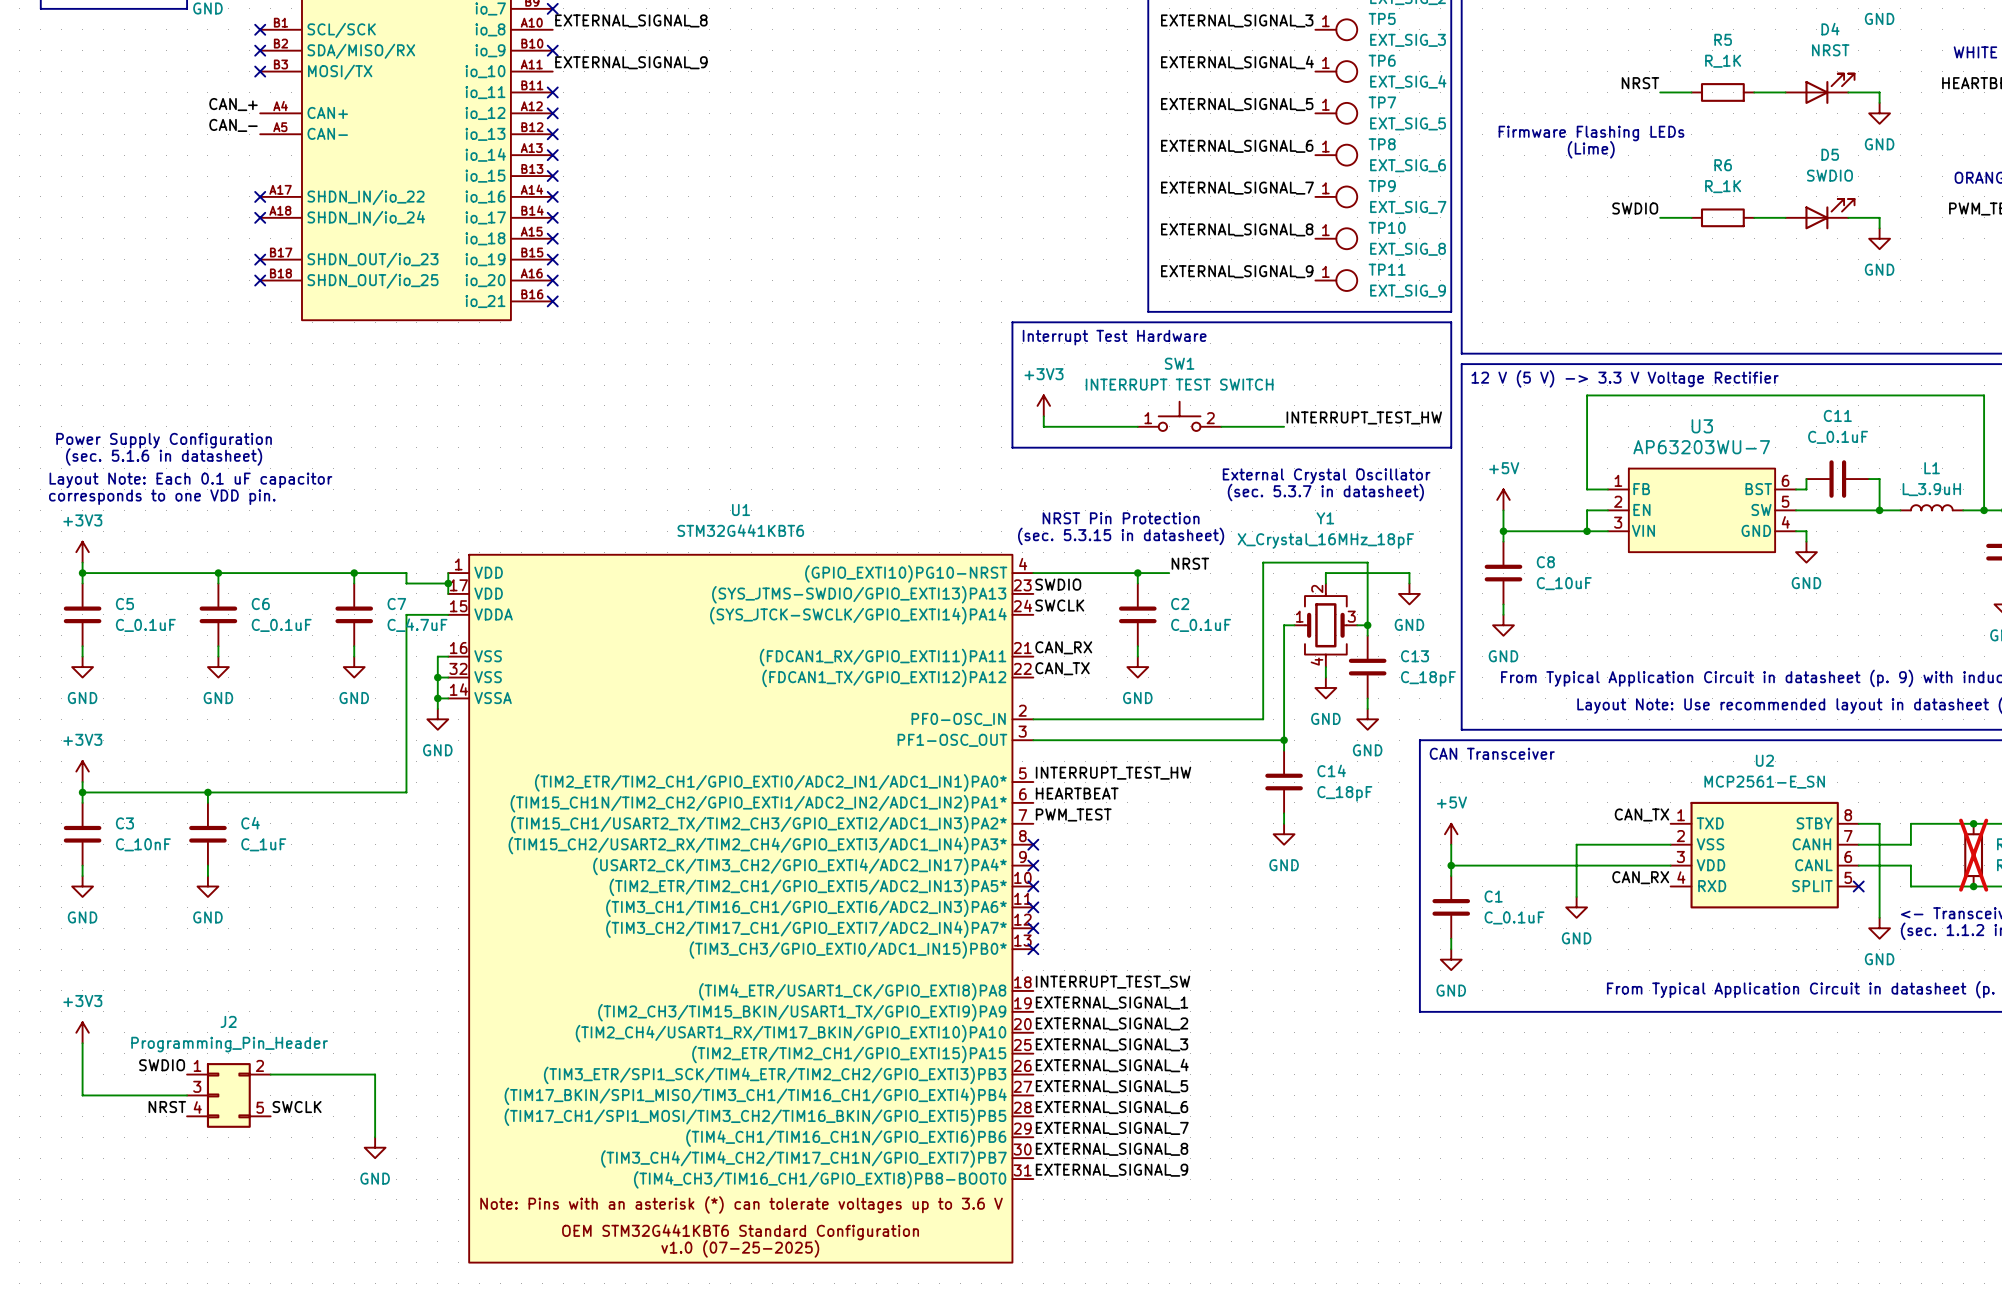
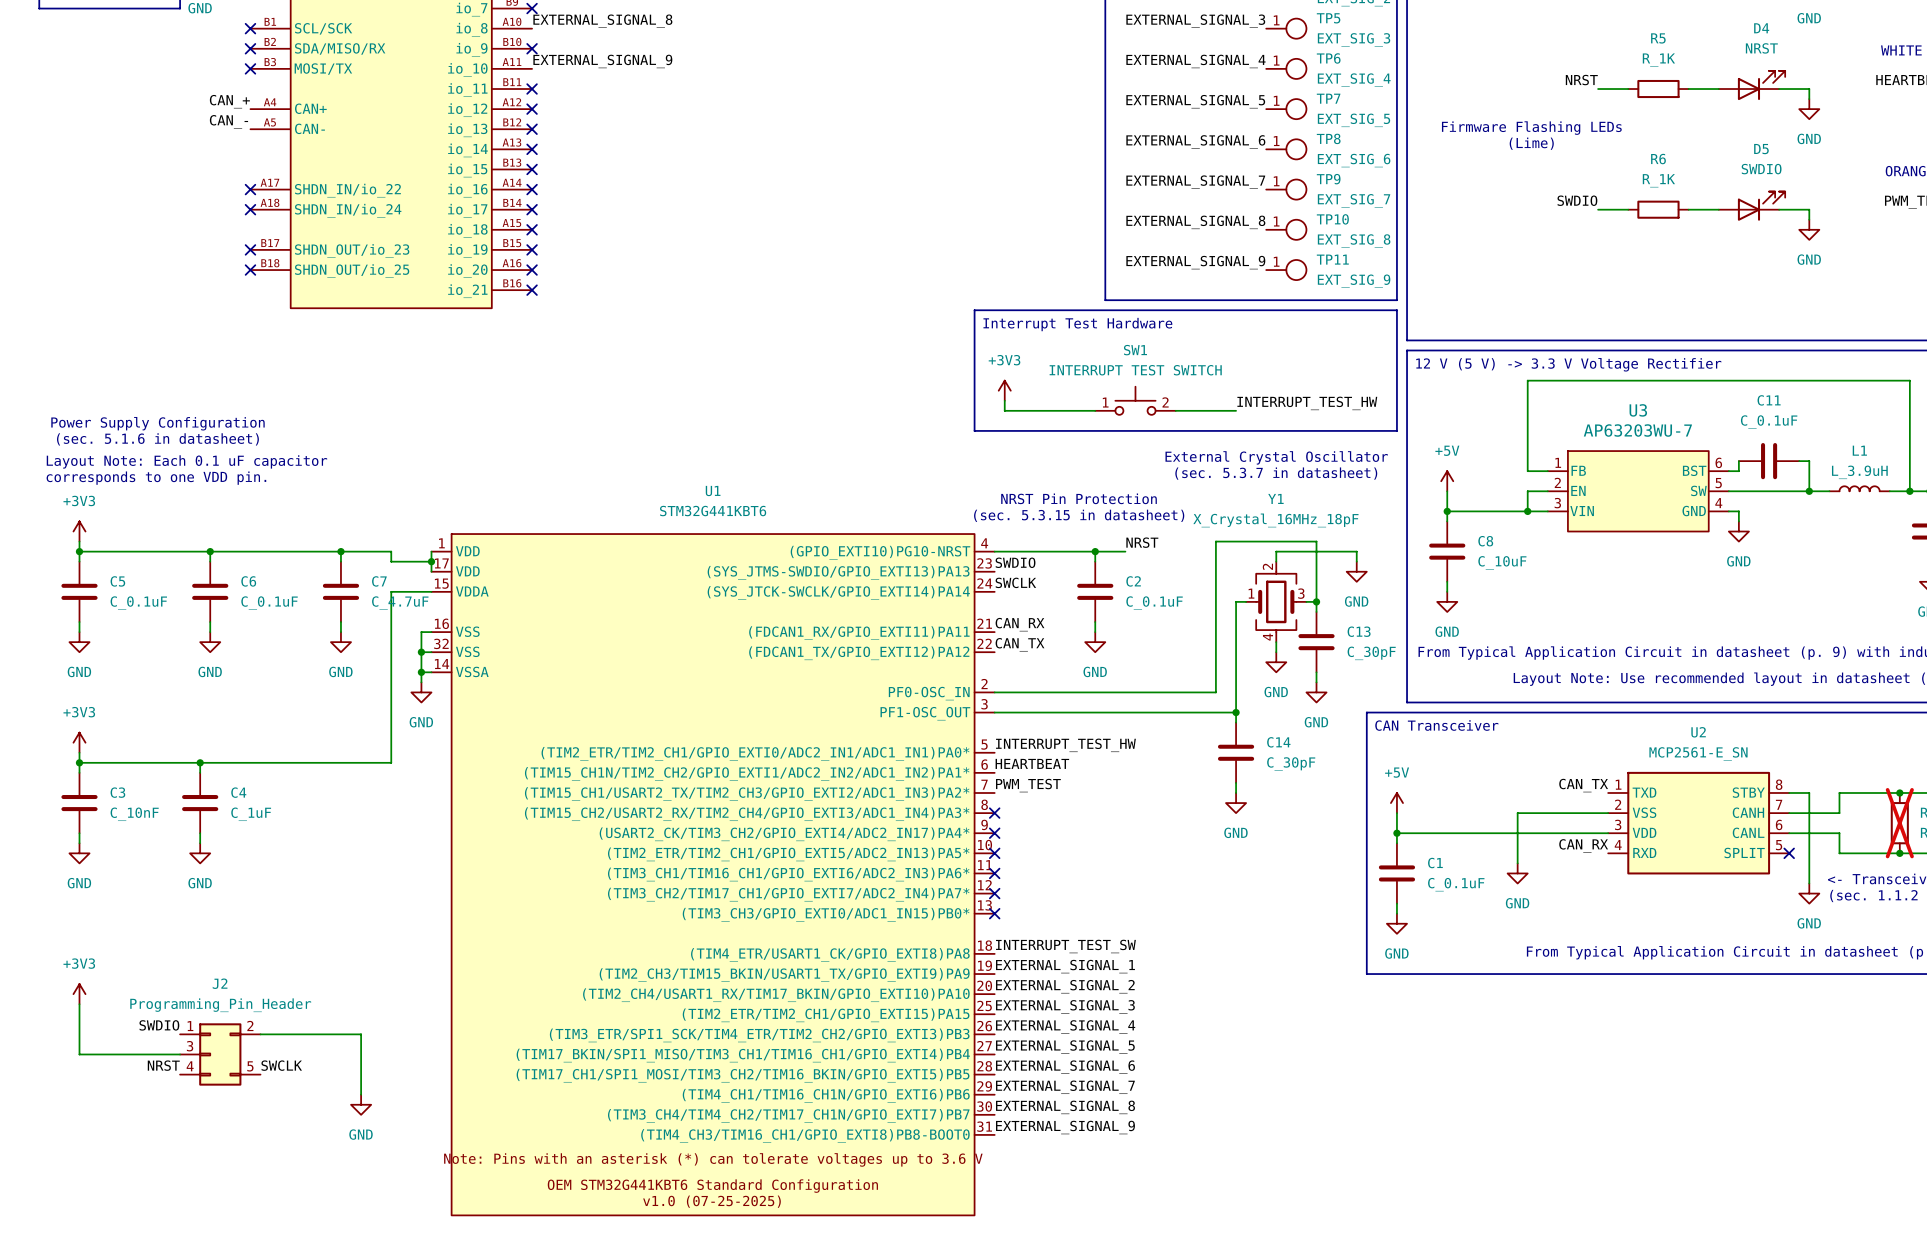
C13 value: C_18pF (1428, 678) -> C_30pF (1371, 653)
C14 value: C_18pF (1344, 793) -> C_30pF (1291, 763)

